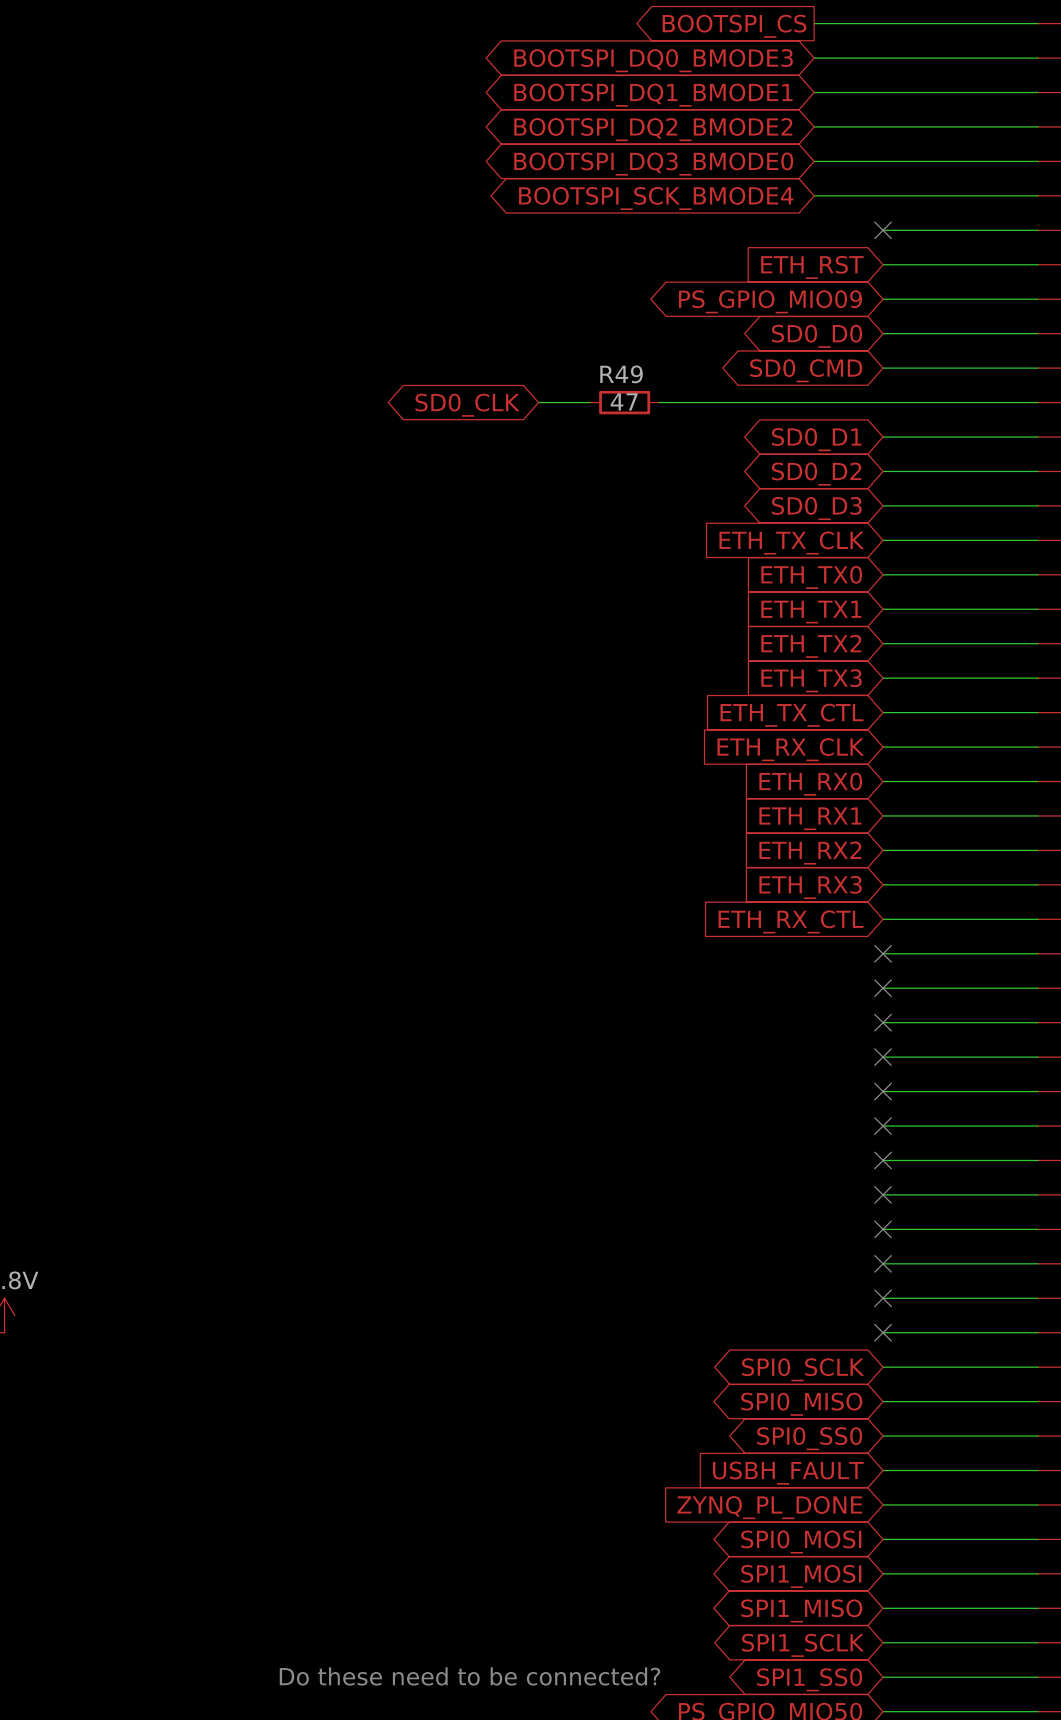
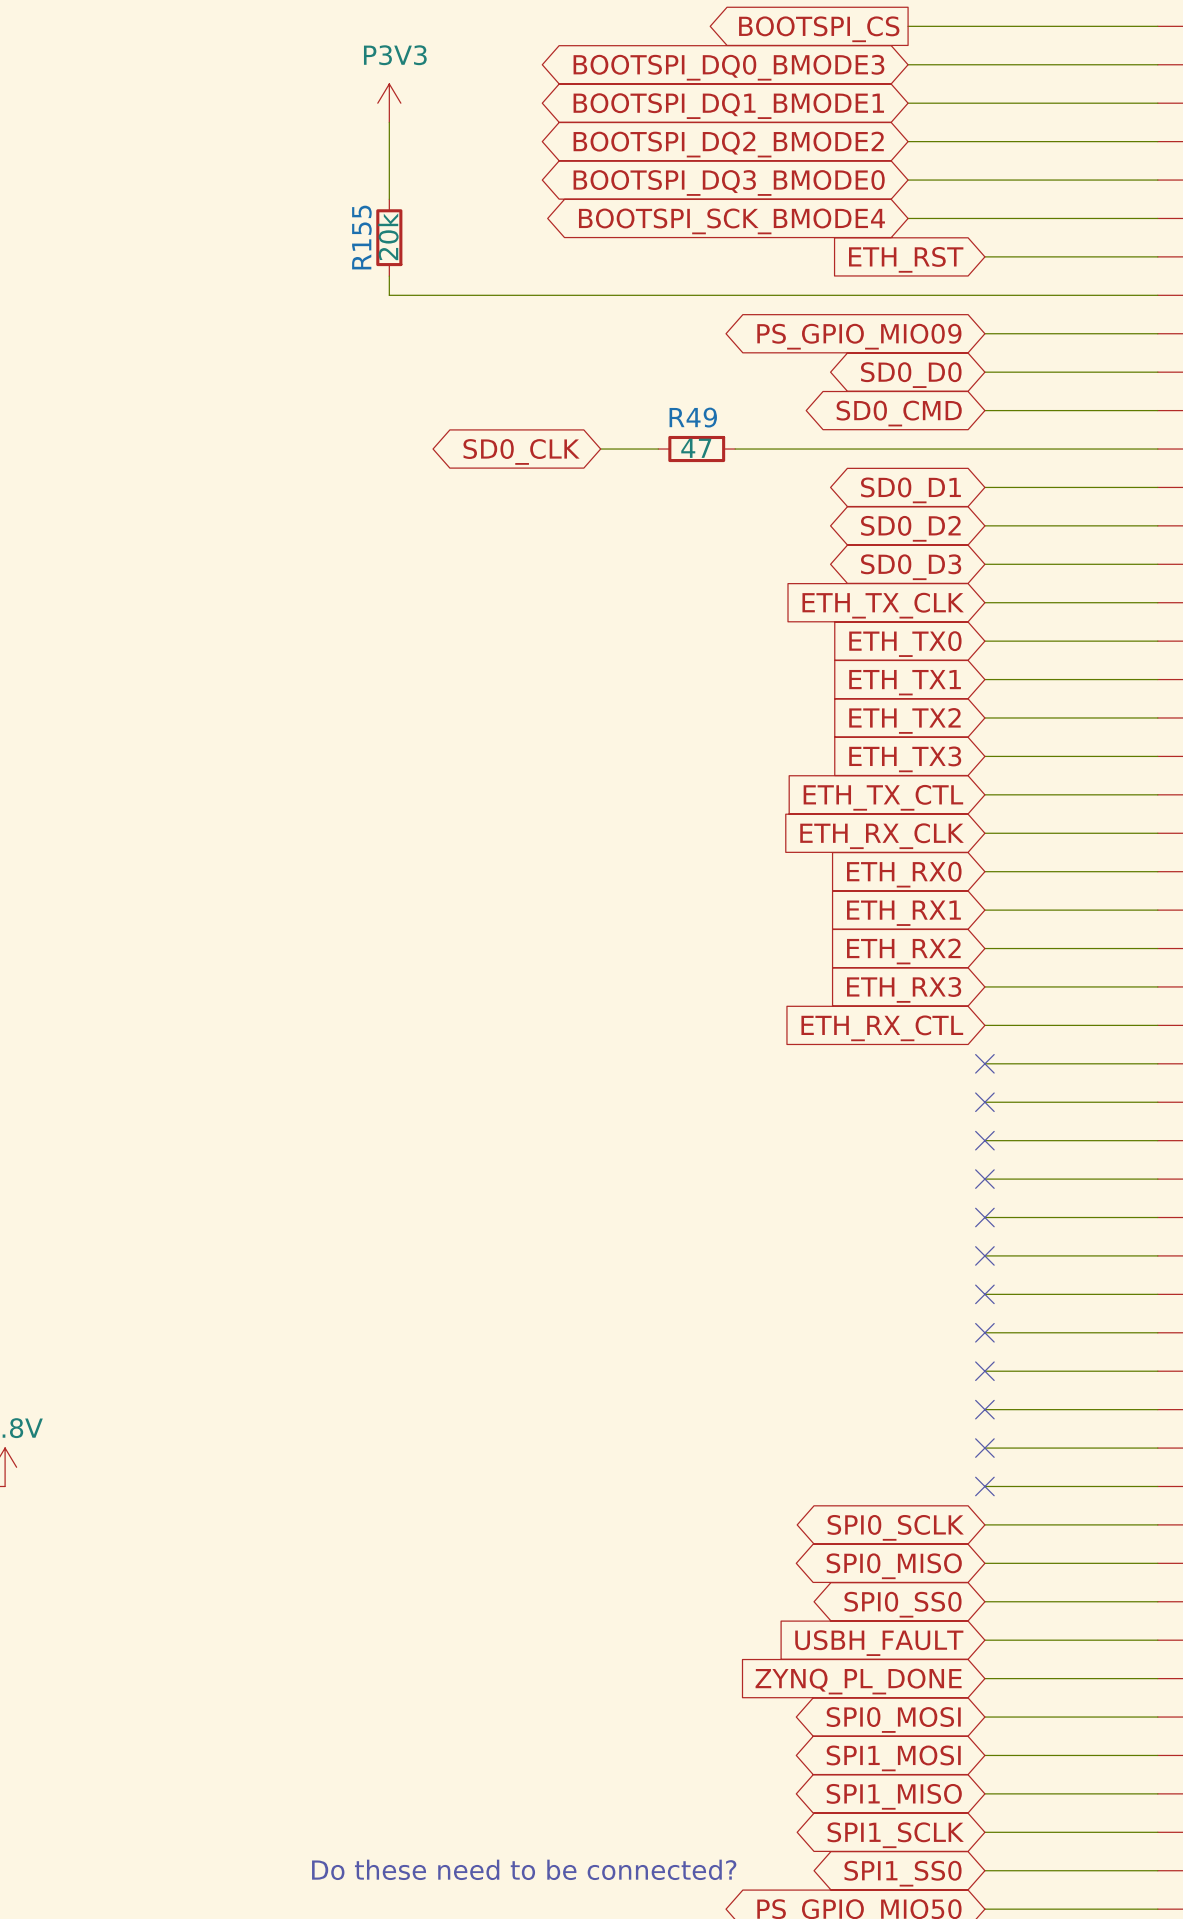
power symbol: none -> P3V3 (389, 103)
wire: none -> (389, 122) (389, 199)
R155: none -> 20k (389, 237)
no-connect mark: (883, 230) -> none
wire: none -> (389, 276) (389, 295) (984, 295)
global label position: ETH_RST (812, 267) -> ETH_RST (906, 259)

